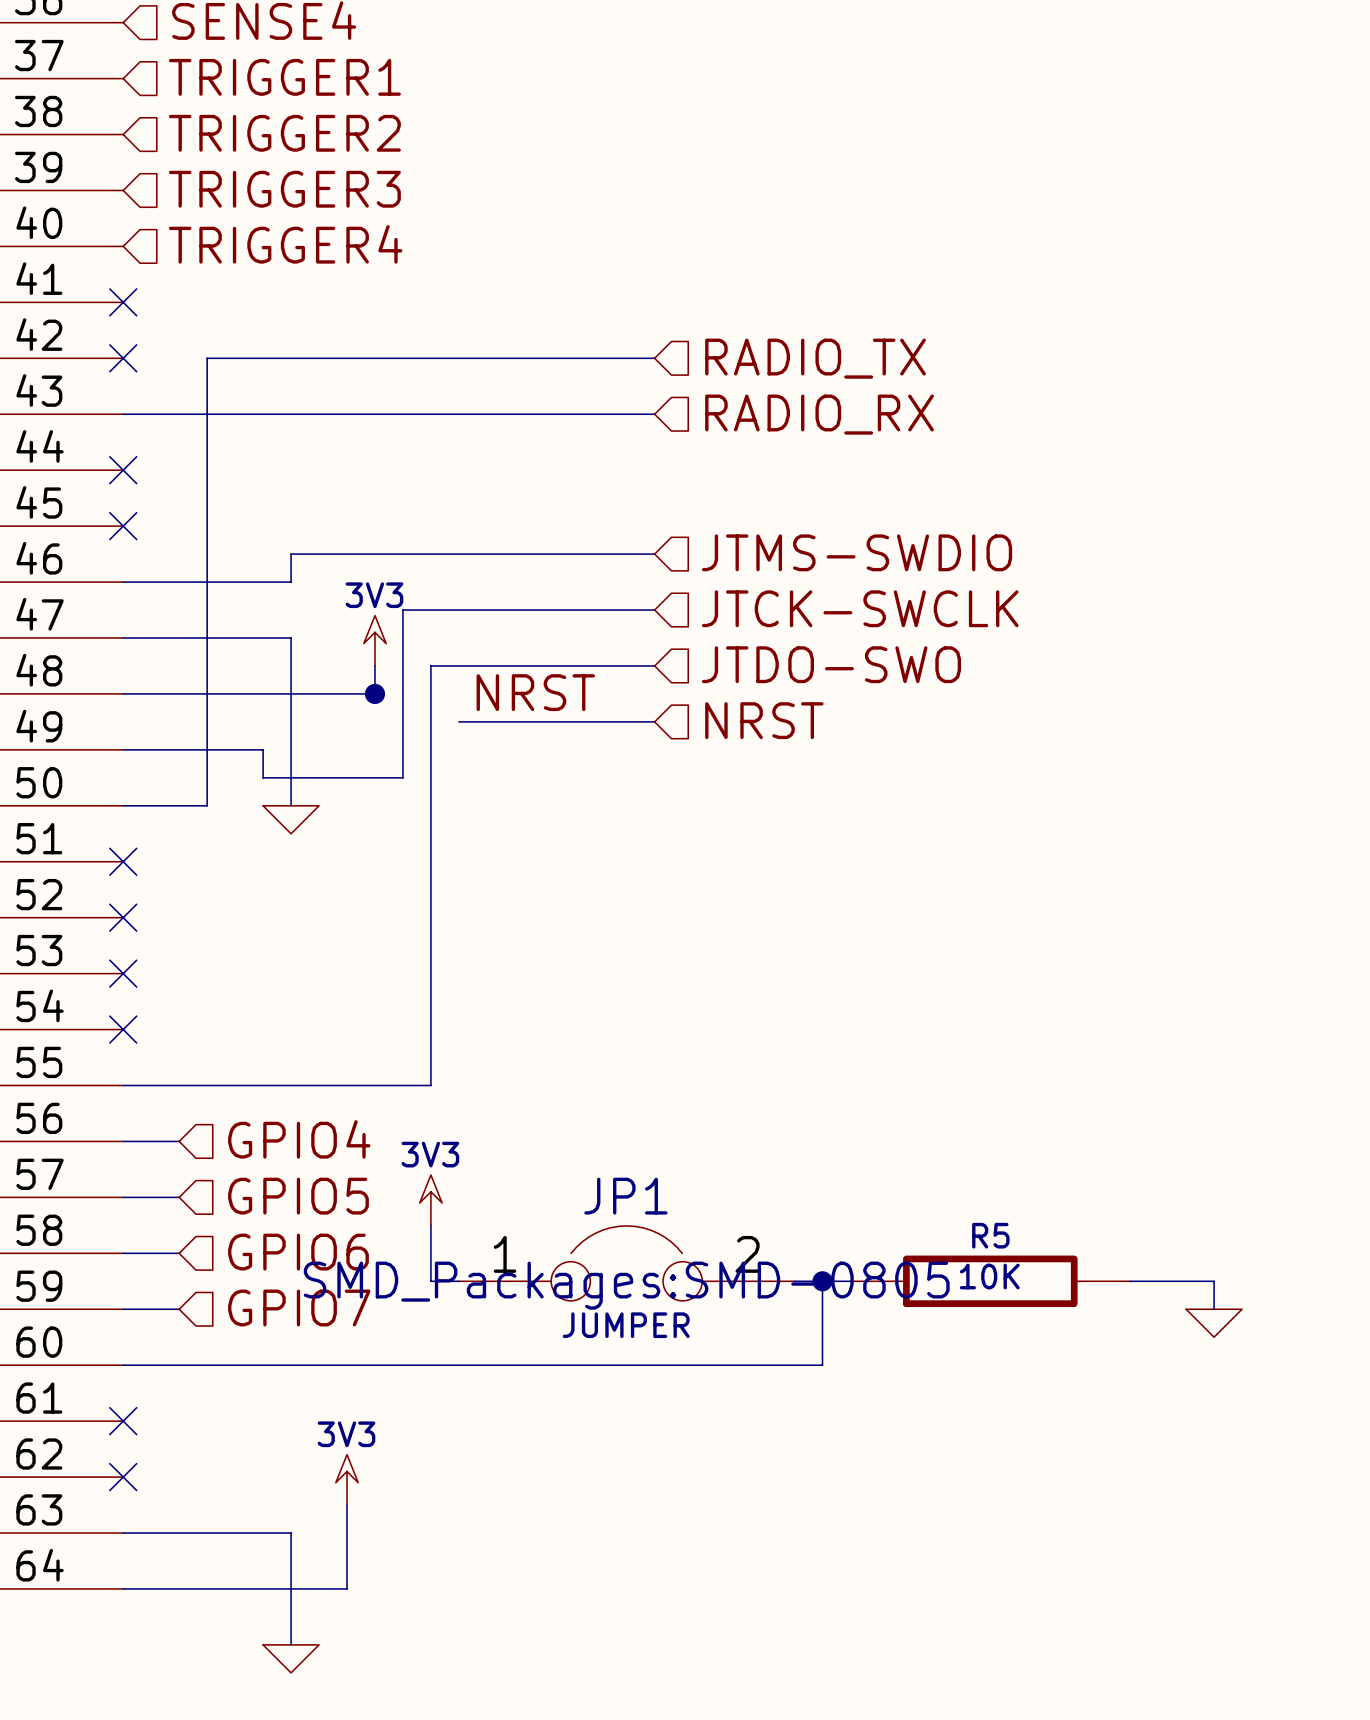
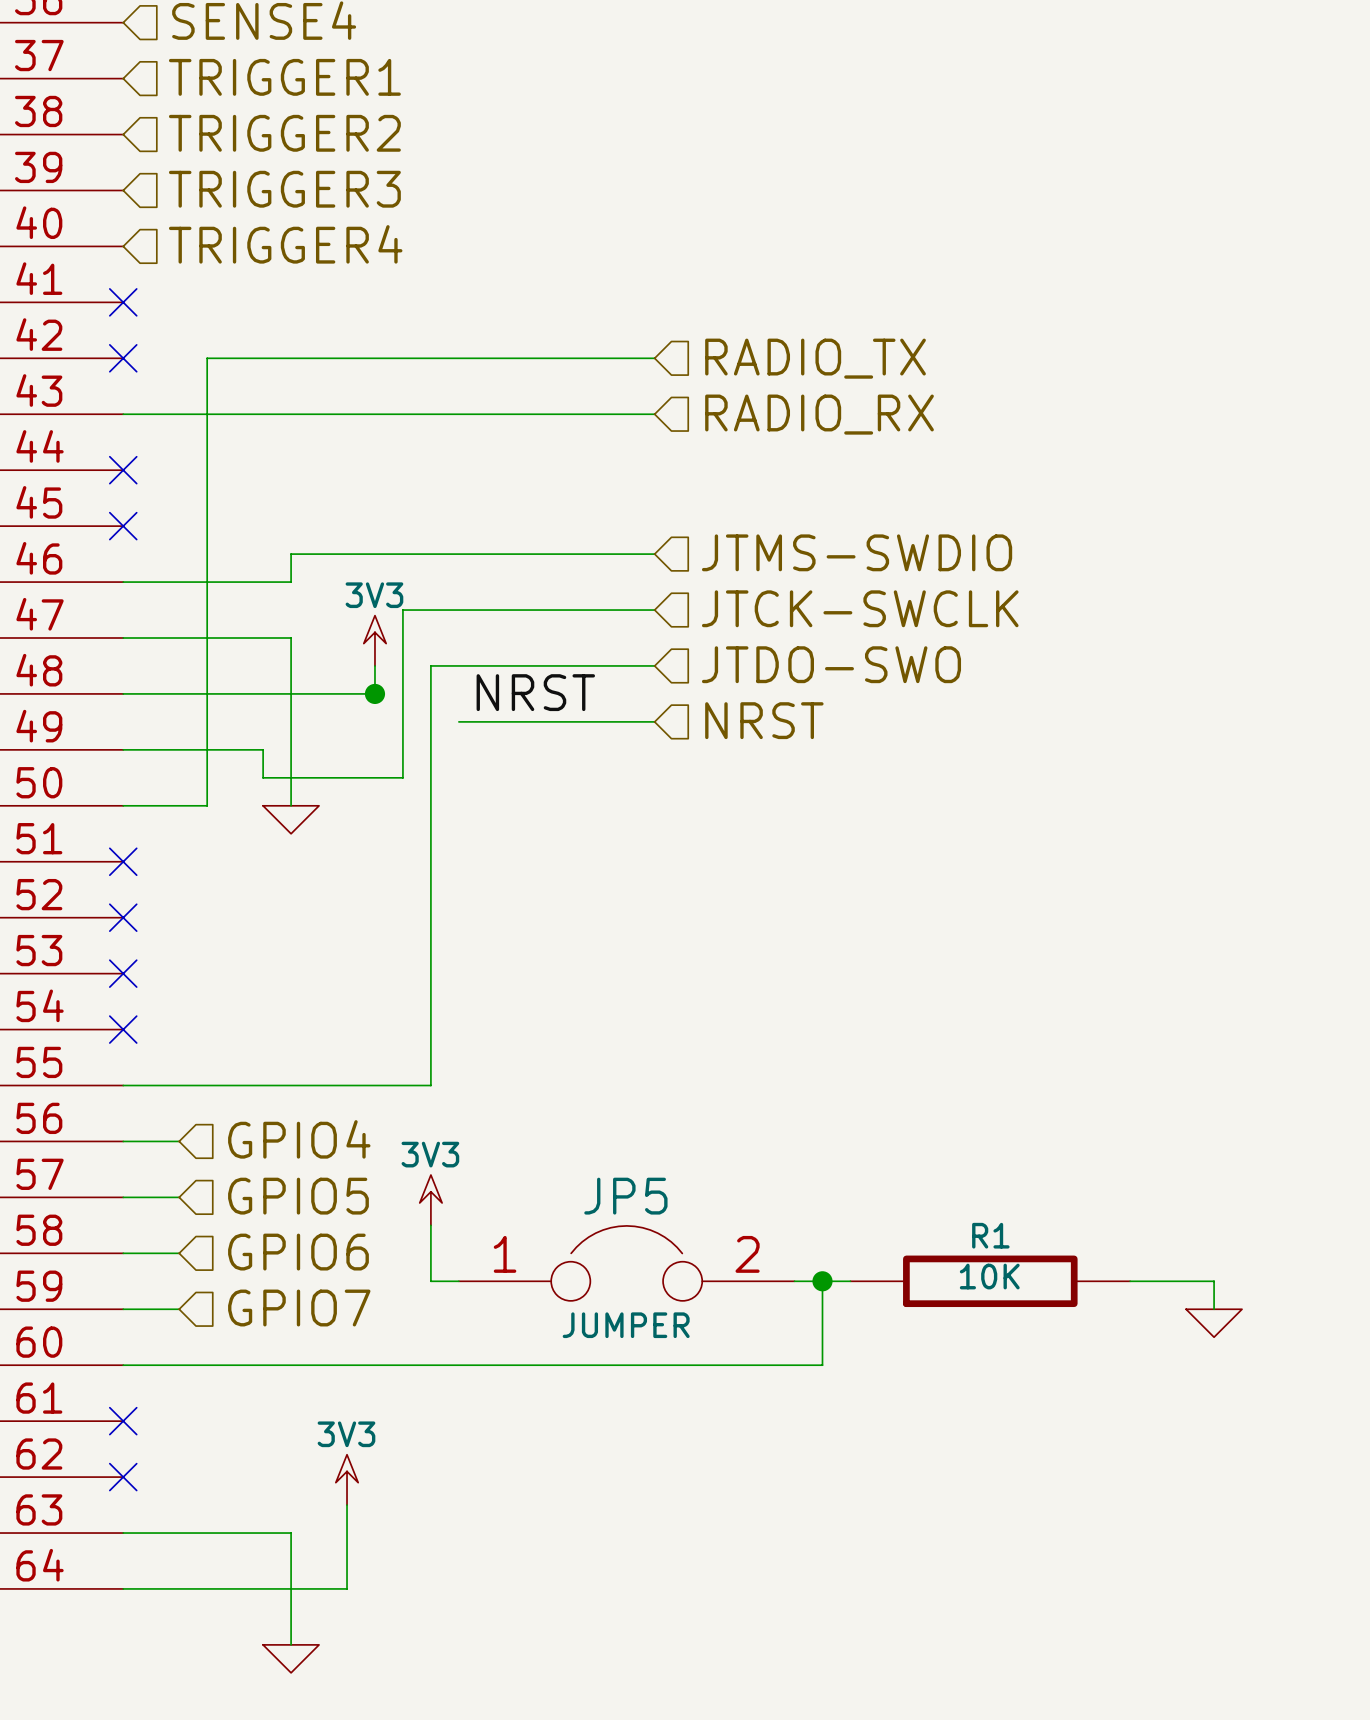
JP1 name: JP1 (625, 1196) -> JP5 (625, 1196)
R5 name: R5 (990, 1235) -> R1 (990, 1235)
JP1 text: SMD_Packages:SMD-0805 (626, 1285) -> none

